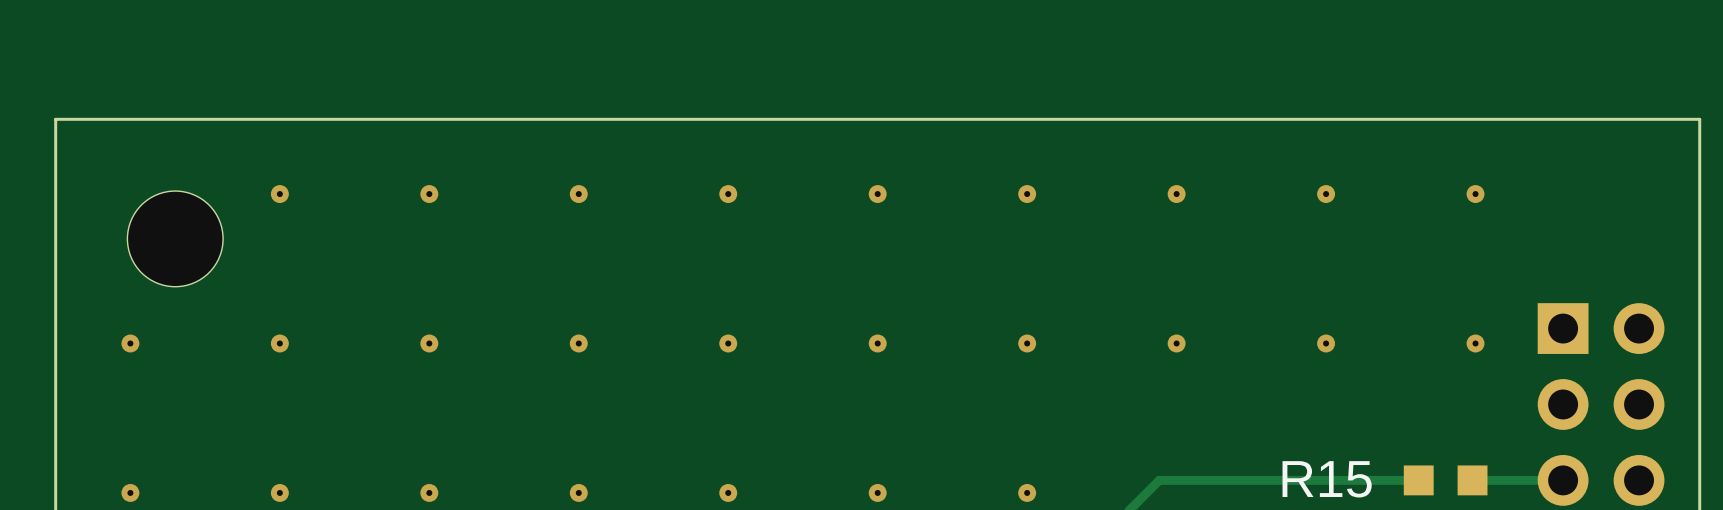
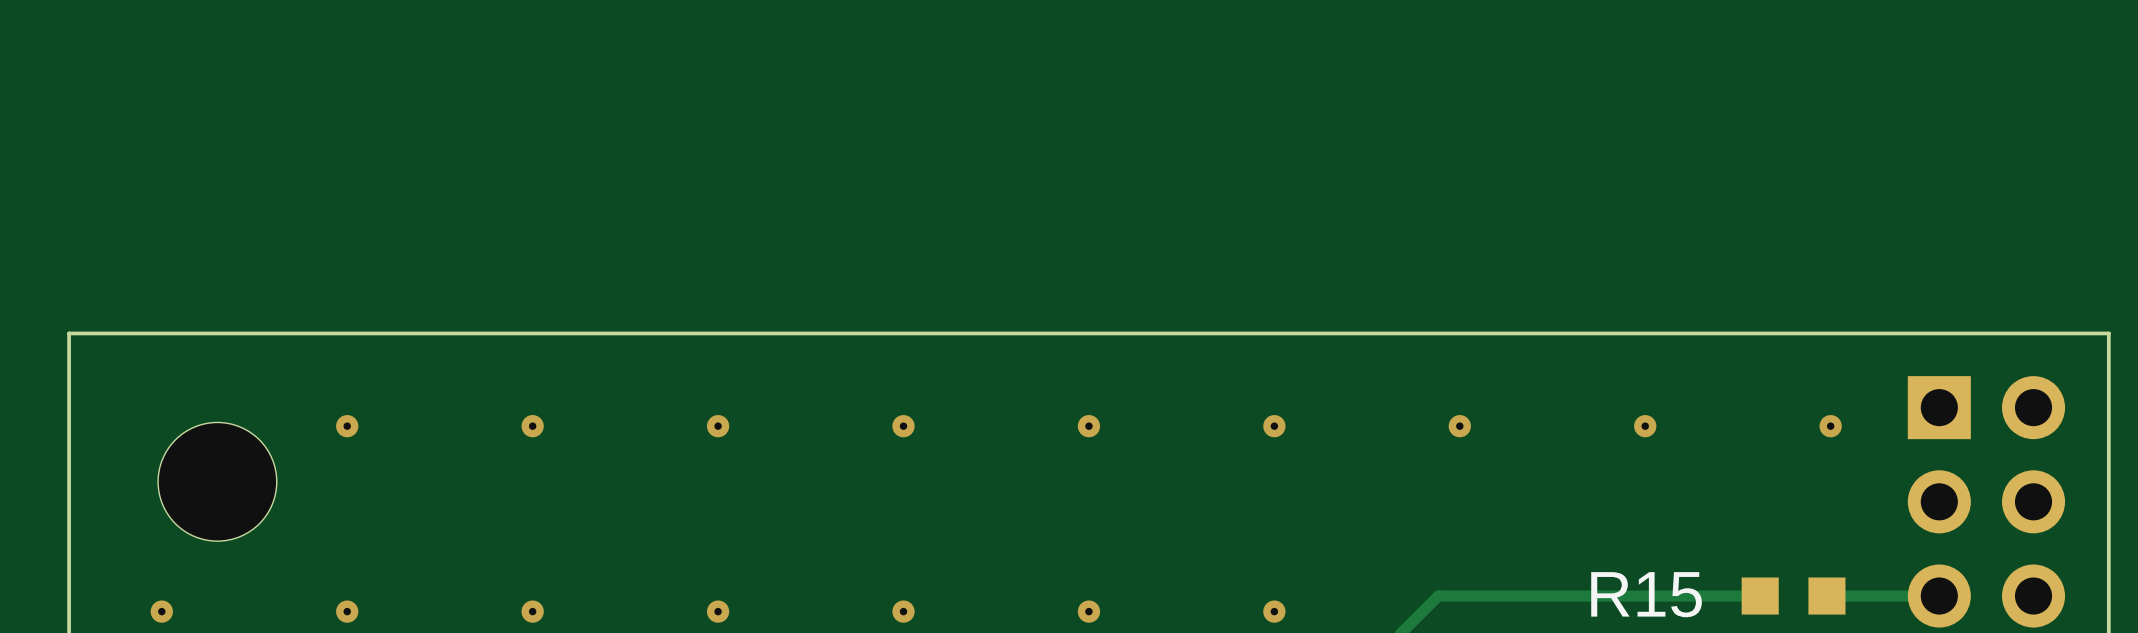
via: (279, 194) -> none
via: (429, 194) -> none
via: (578, 194) -> none
via: (728, 194) -> none
via: (877, 194) -> none
via: (1027, 194) -> none
via: (1176, 194) -> none
via: (1326, 194) -> none
via: (1475, 194) -> none
part position: (175, 238) -> (217, 481)
board edge: (55, 268) (55, 119) (1699, 119) (1699, 268) -> (69, 333) (2108, 333)
via: (130, 343) -> none

